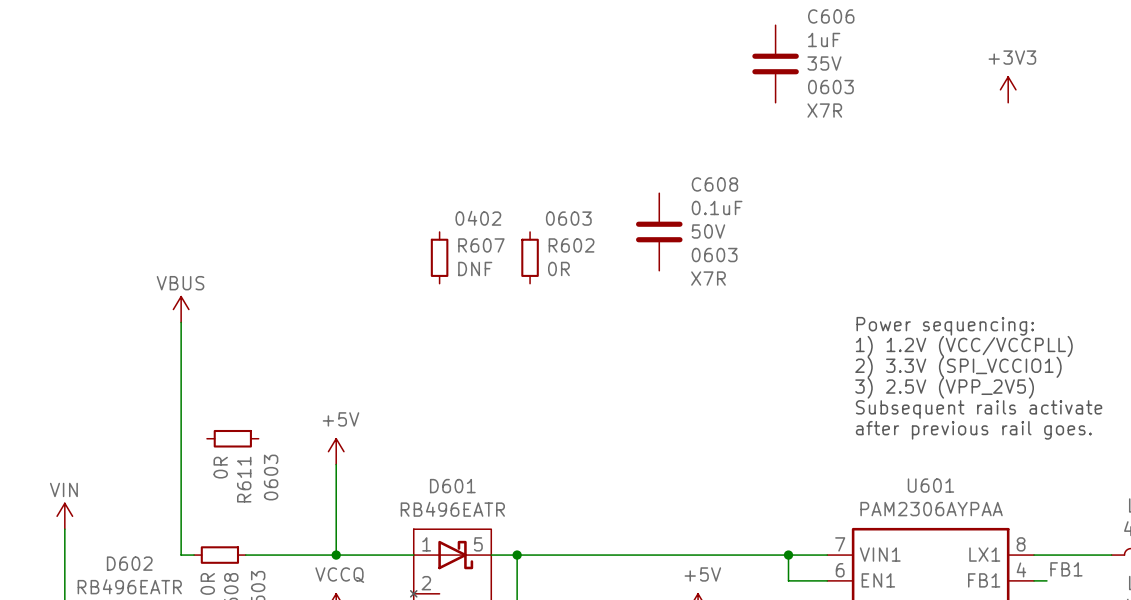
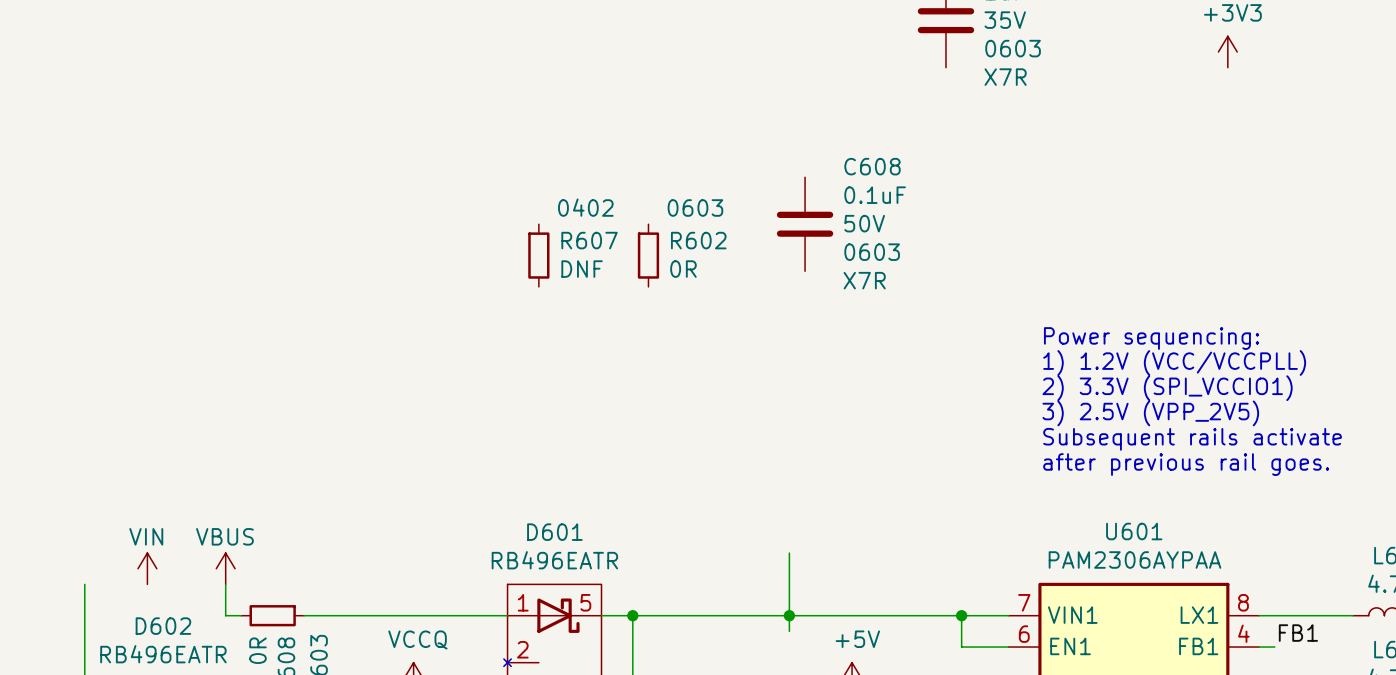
power symbol position: VBUS (181, 309) -> VBUS (225, 568)
wire: (181, 322) (181, 529) -> none
R611: 0R (232, 438) -> none
power symbol: +5V (336, 451) -> none
wire: (336, 464) (336, 555) -> none
wire: none -> (789, 553) (789, 631)
power symbol position: VIN (64, 516) -> VIN (147, 568)
junction: (336, 555) -> none
junction: none -> (789, 615)

